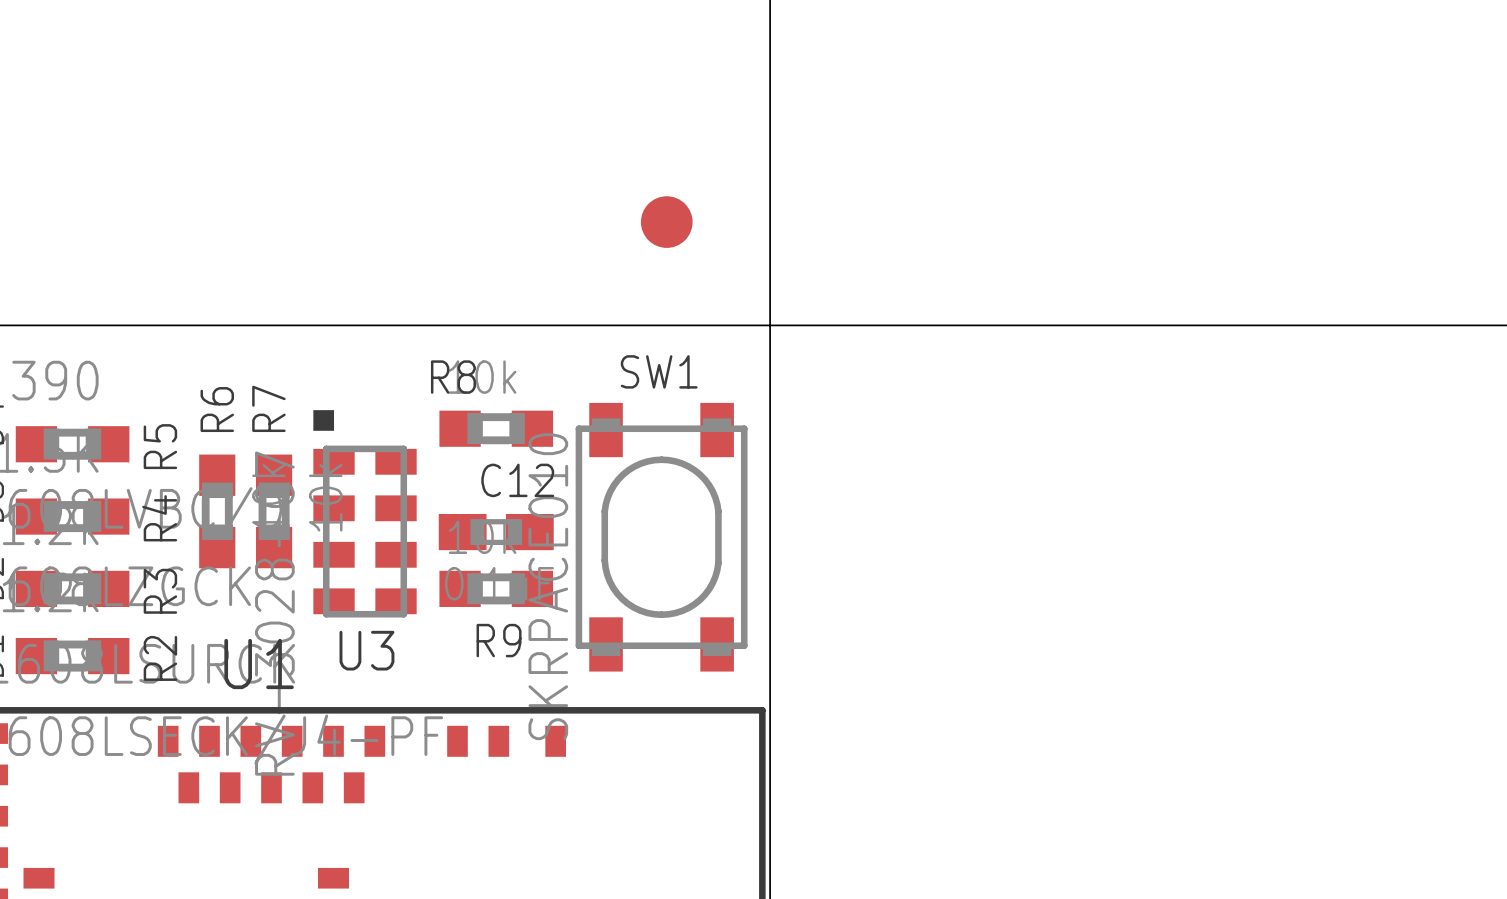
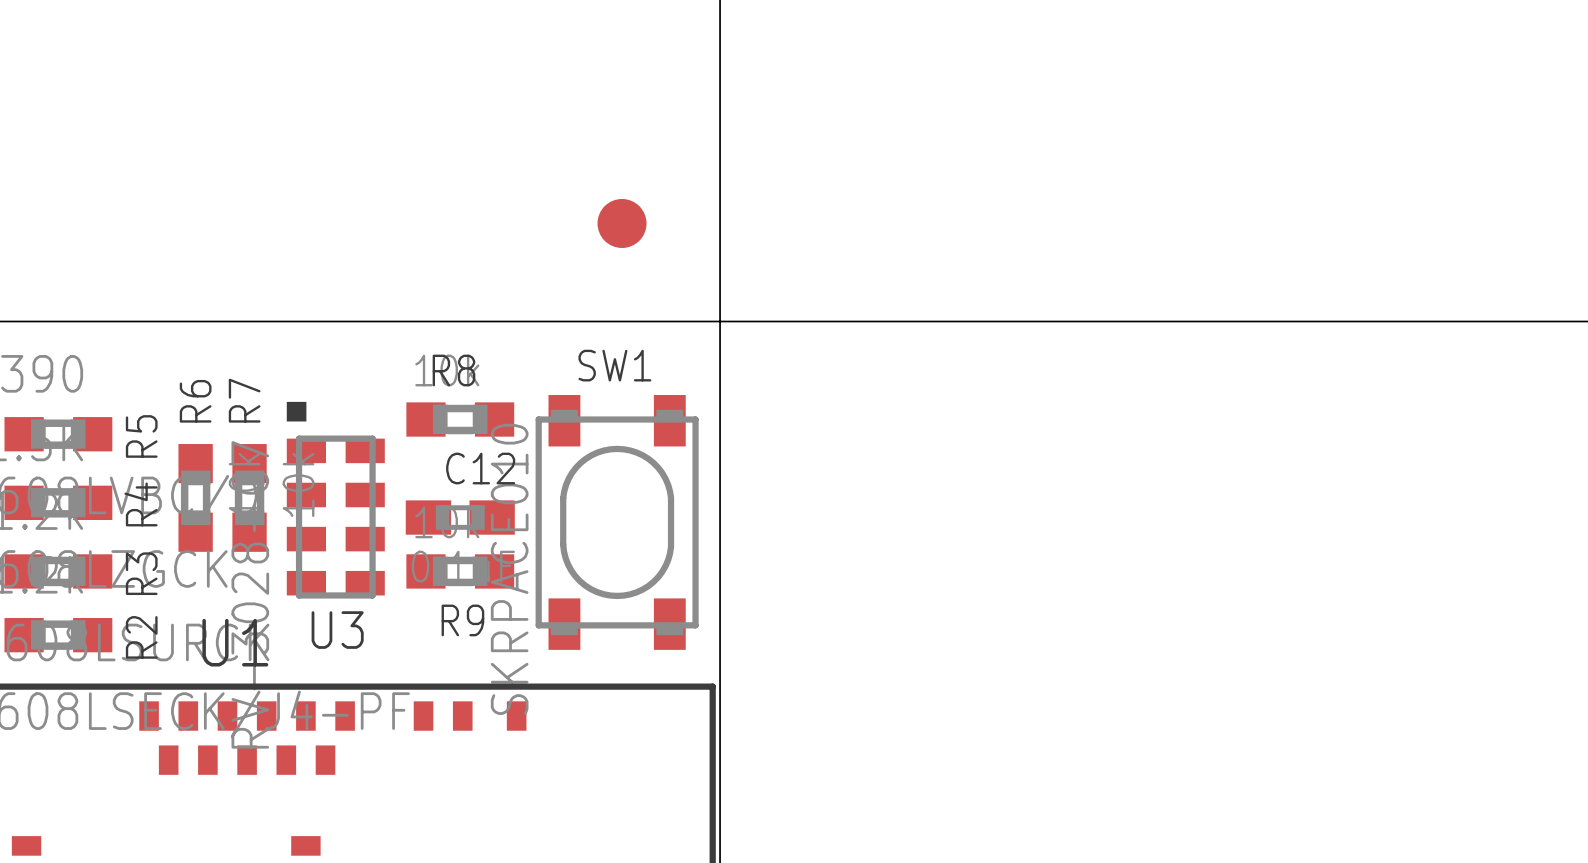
R8 name position: R8 (453, 377) -> R8 (453, 370)

